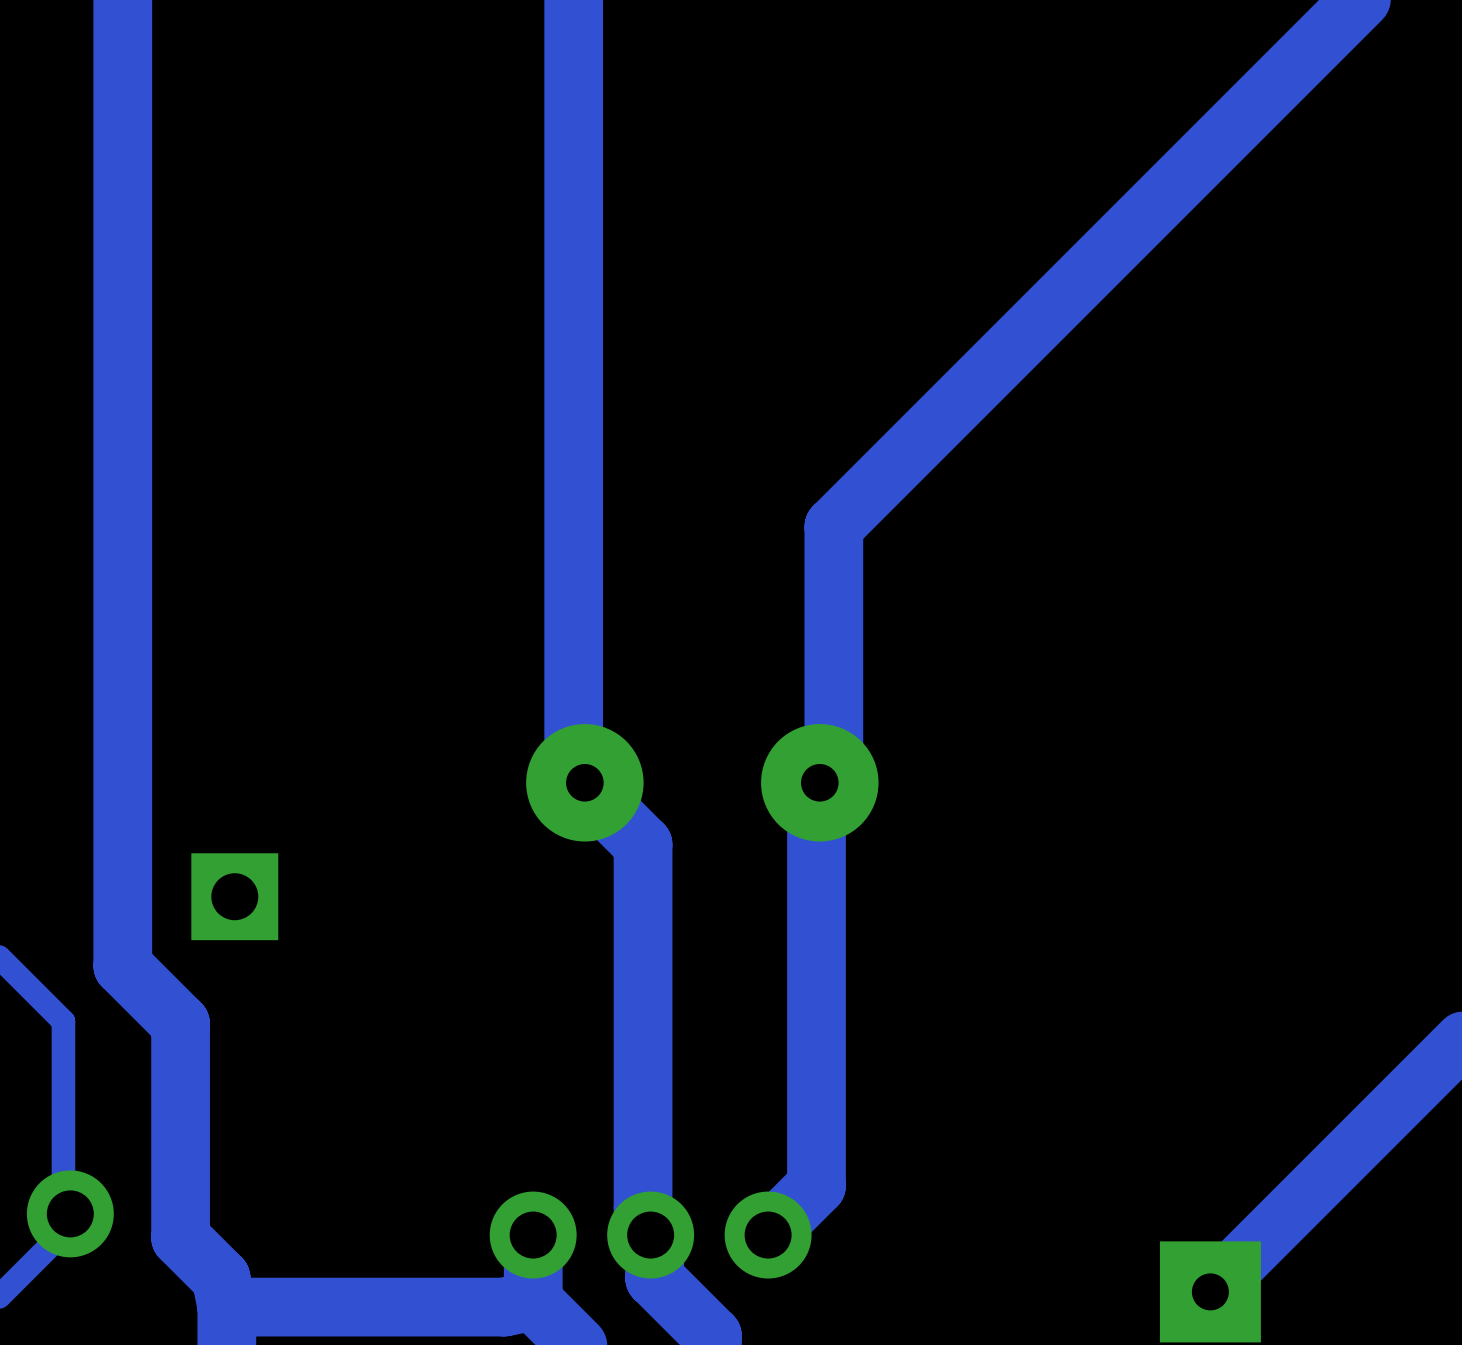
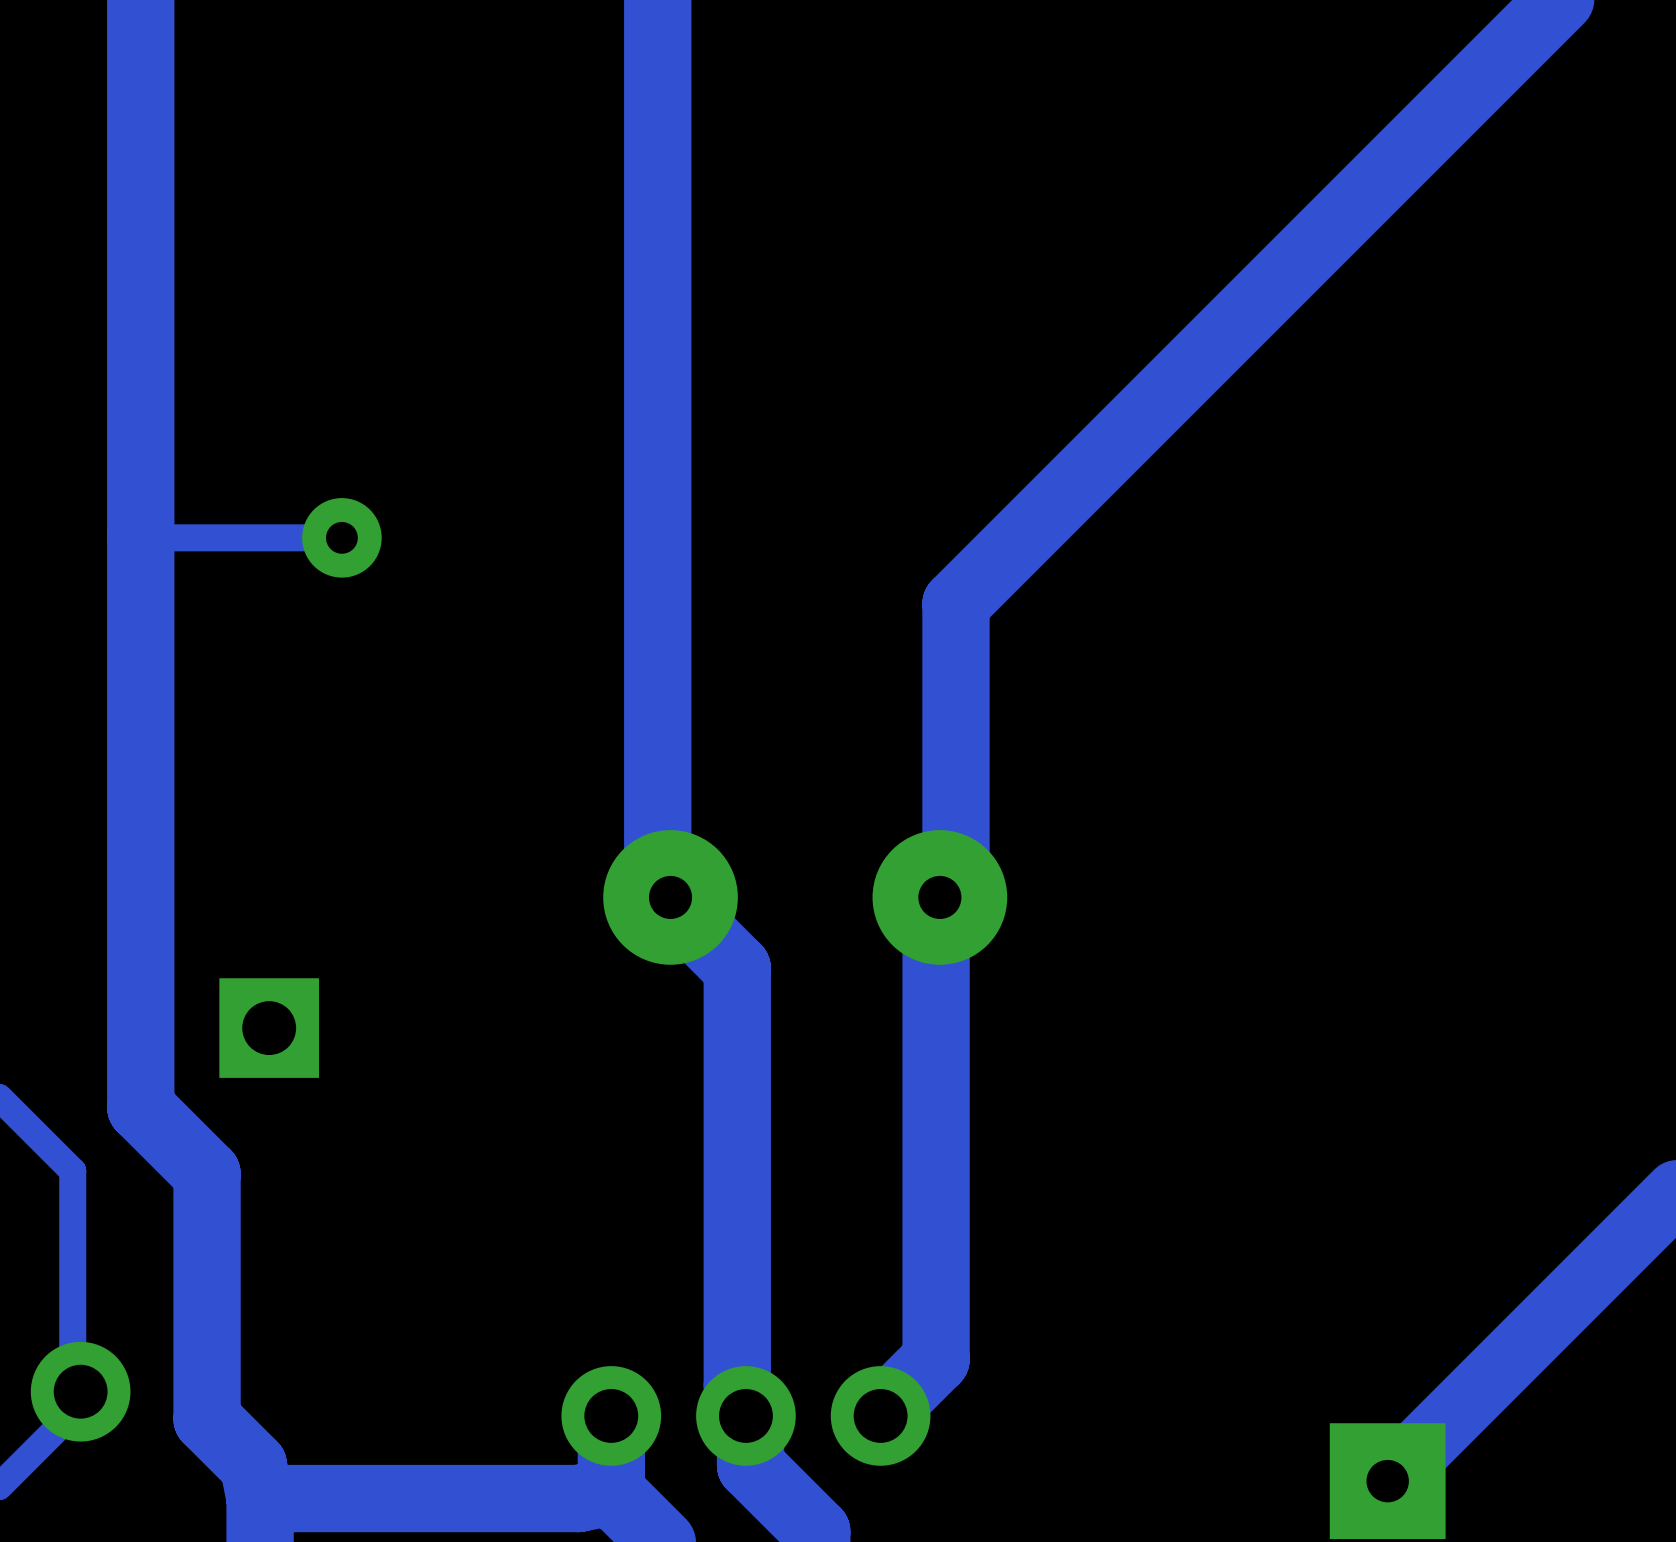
track: none -> (140, 536) (341, 537)
via: none -> (341, 537)

